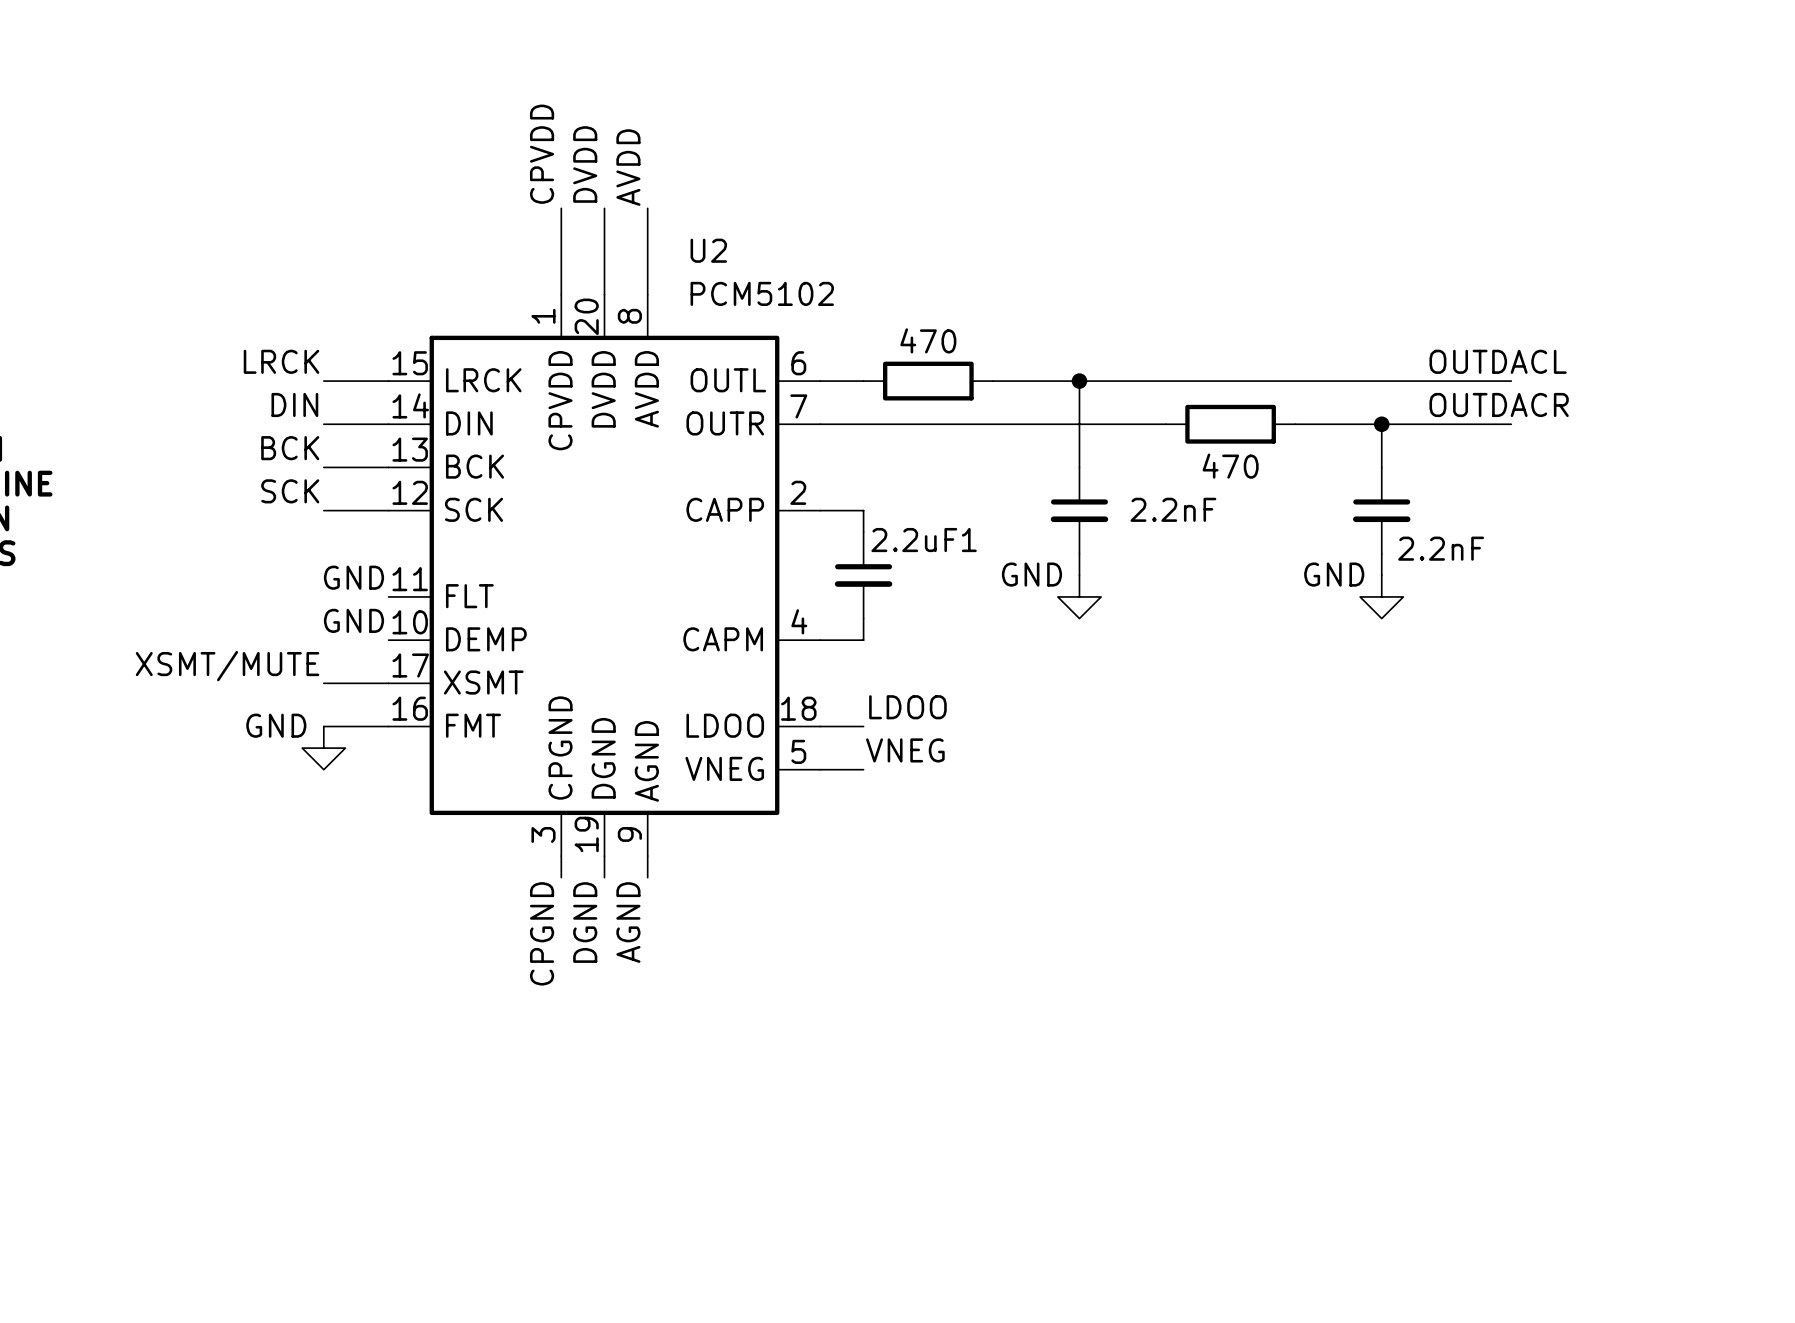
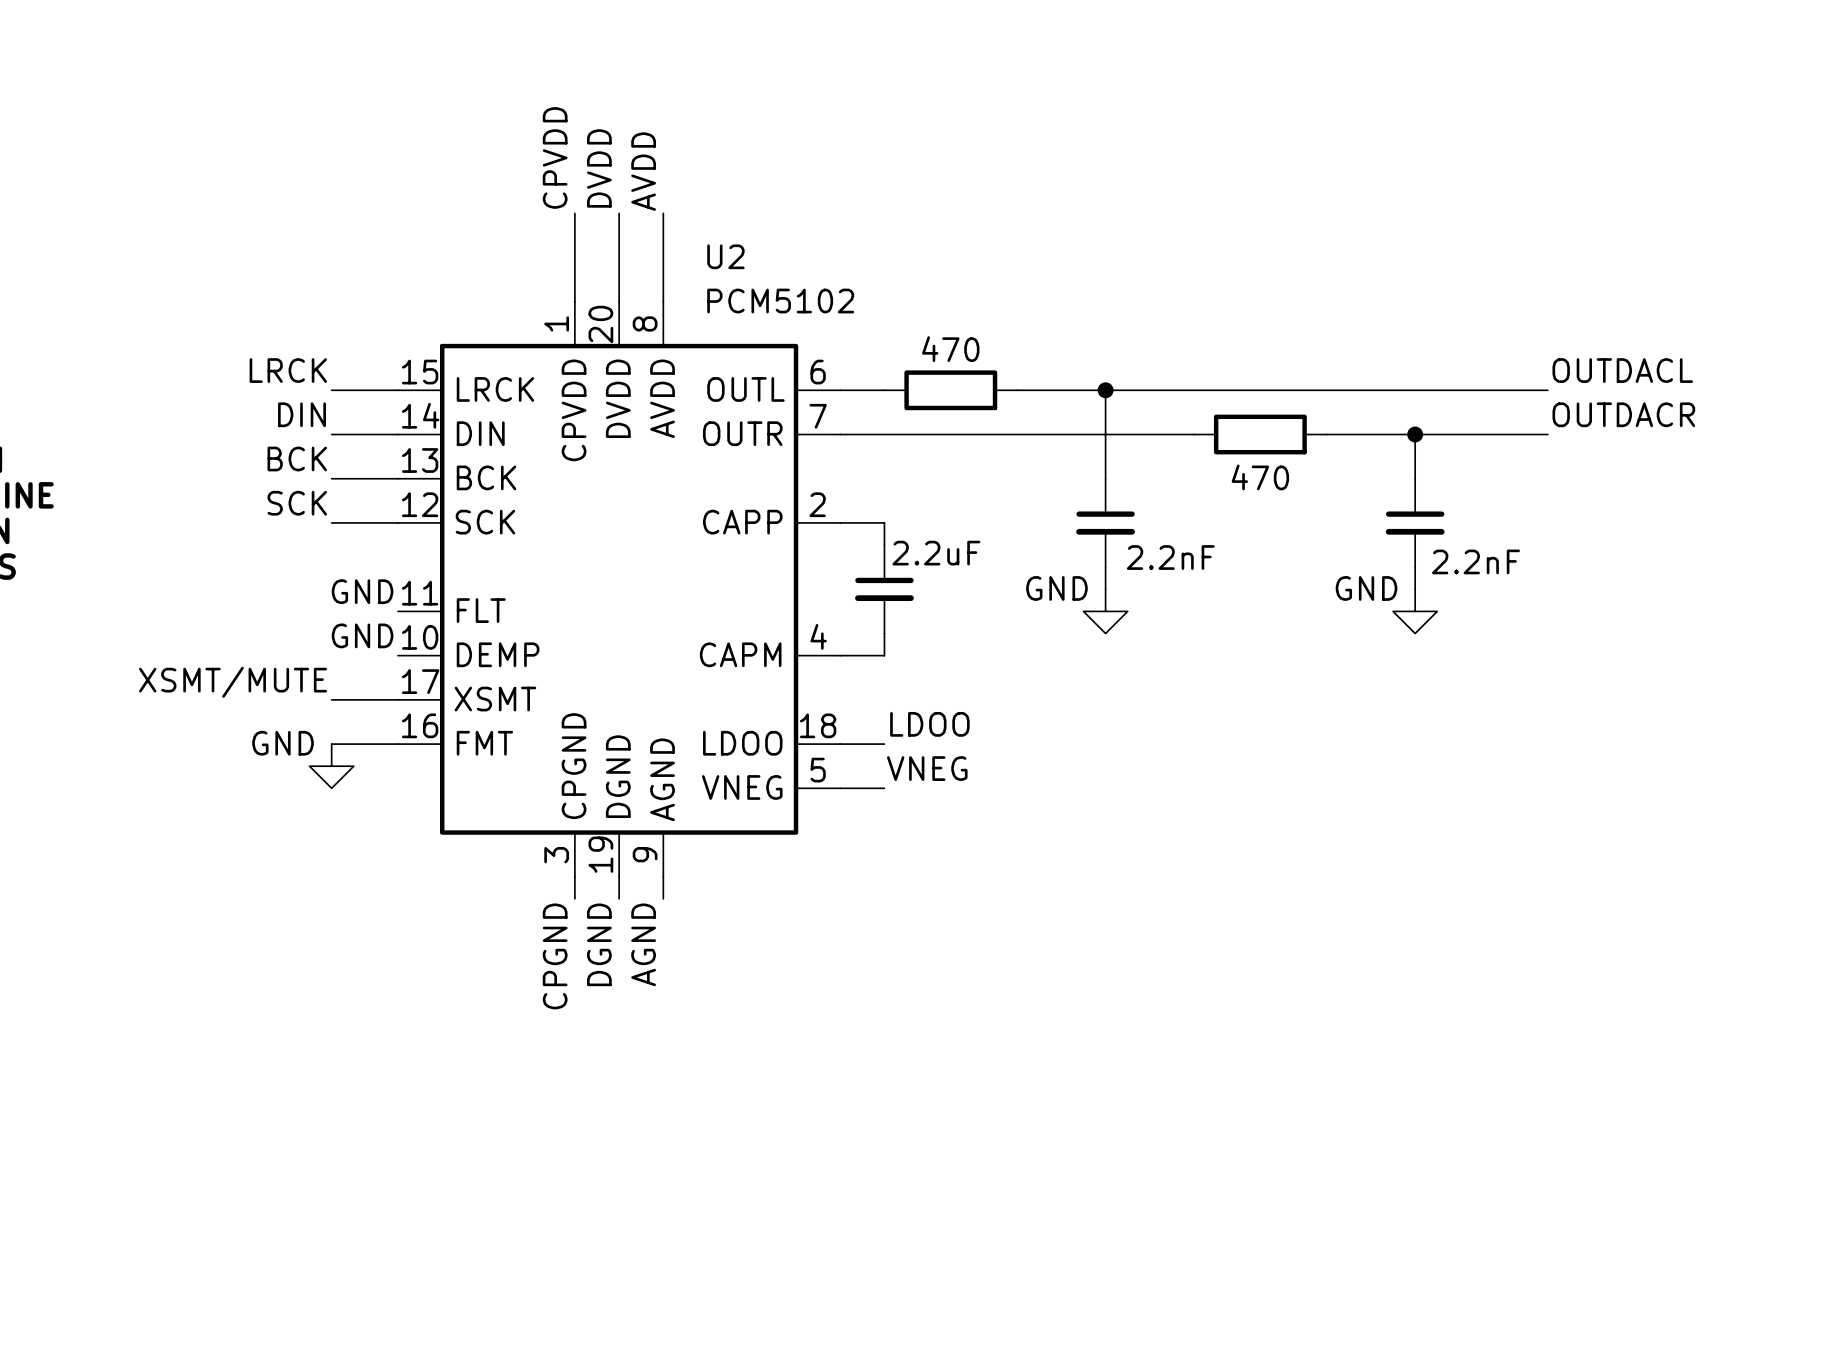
label position: OUTDACL (1498, 361) -> OUTDACL (1622, 370)
label position: OUTDACR (1499, 404) -> OUTDACR (1623, 414)
2.2nF name position: 2.2nF (1173, 509) -> 2.2nF (1170, 557)
2.2uF1 name: 2.2uF1 (924, 540) -> 2.2uF (936, 553)

